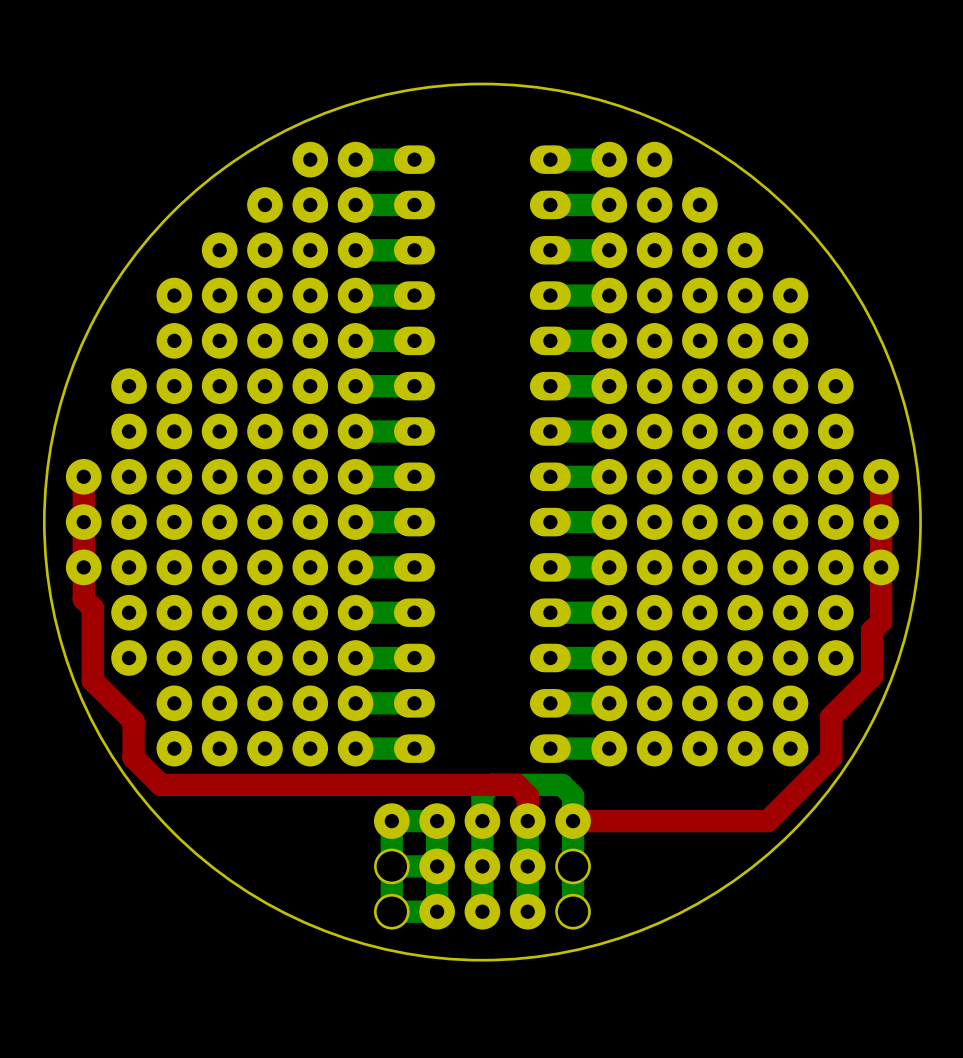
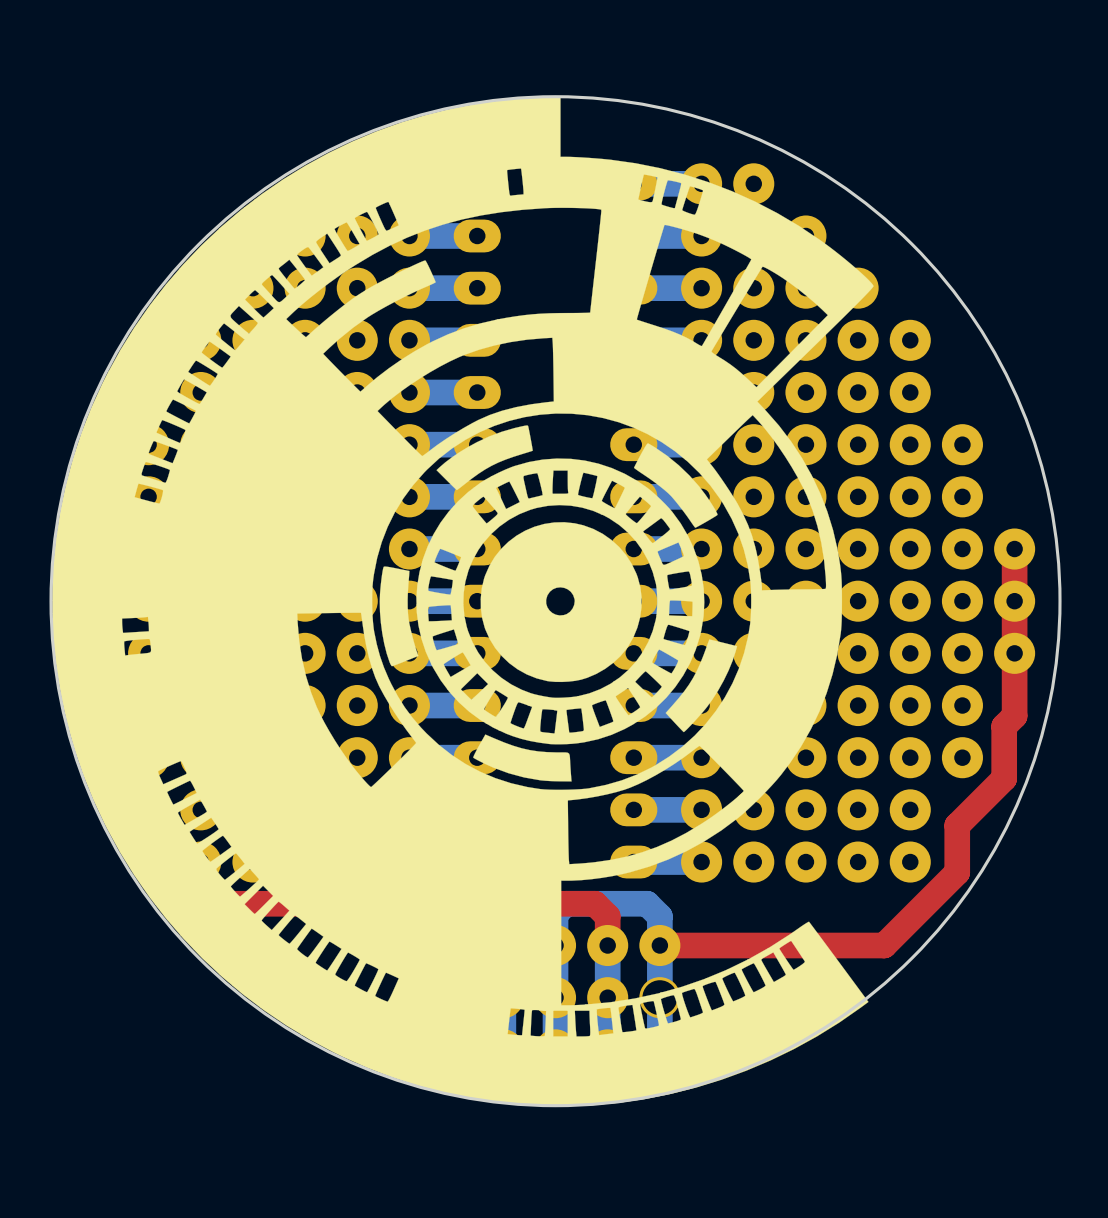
drawing: none -> [52, 96, 874, 1107]

